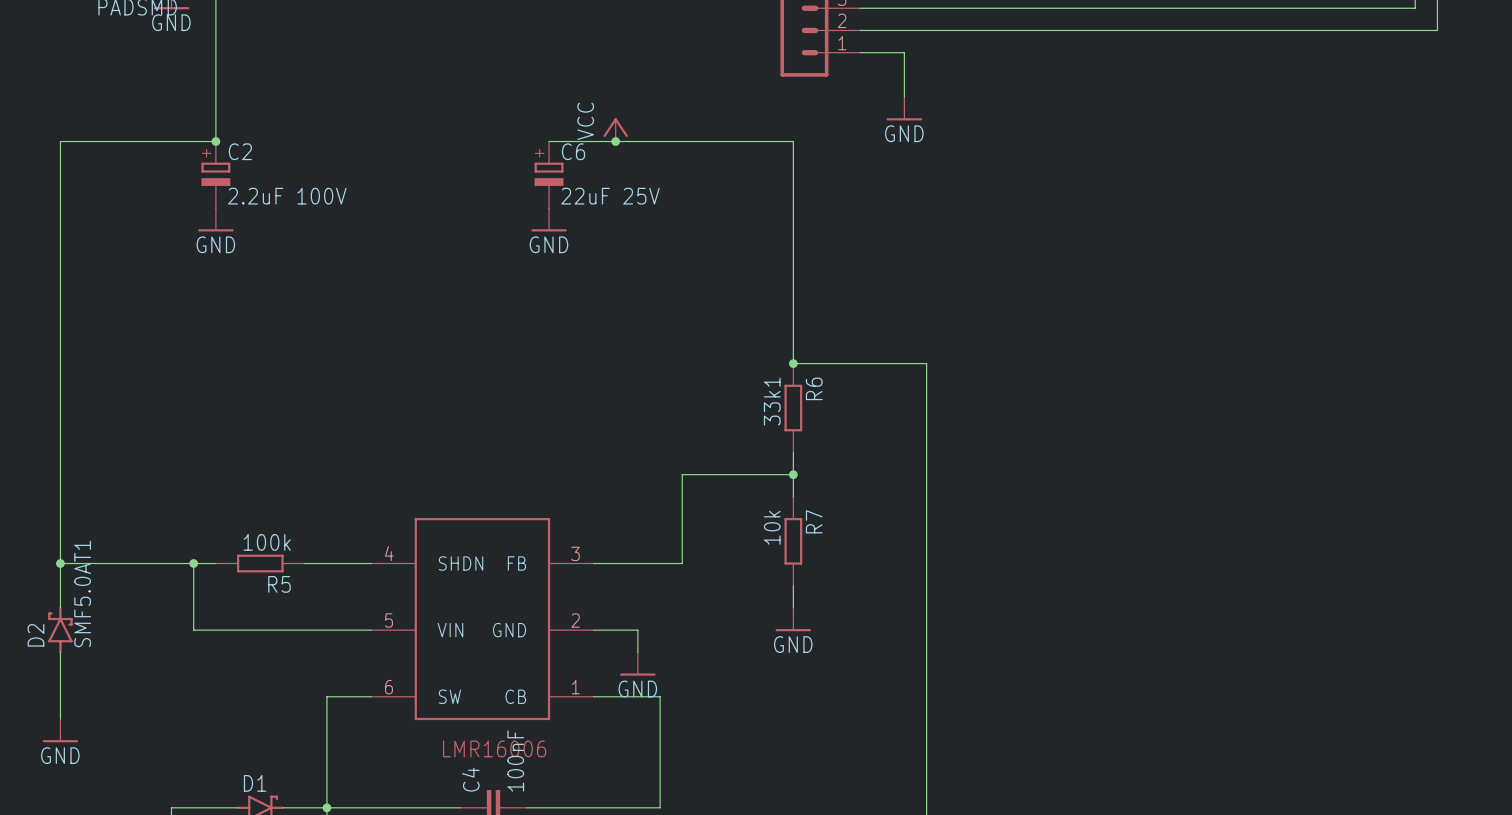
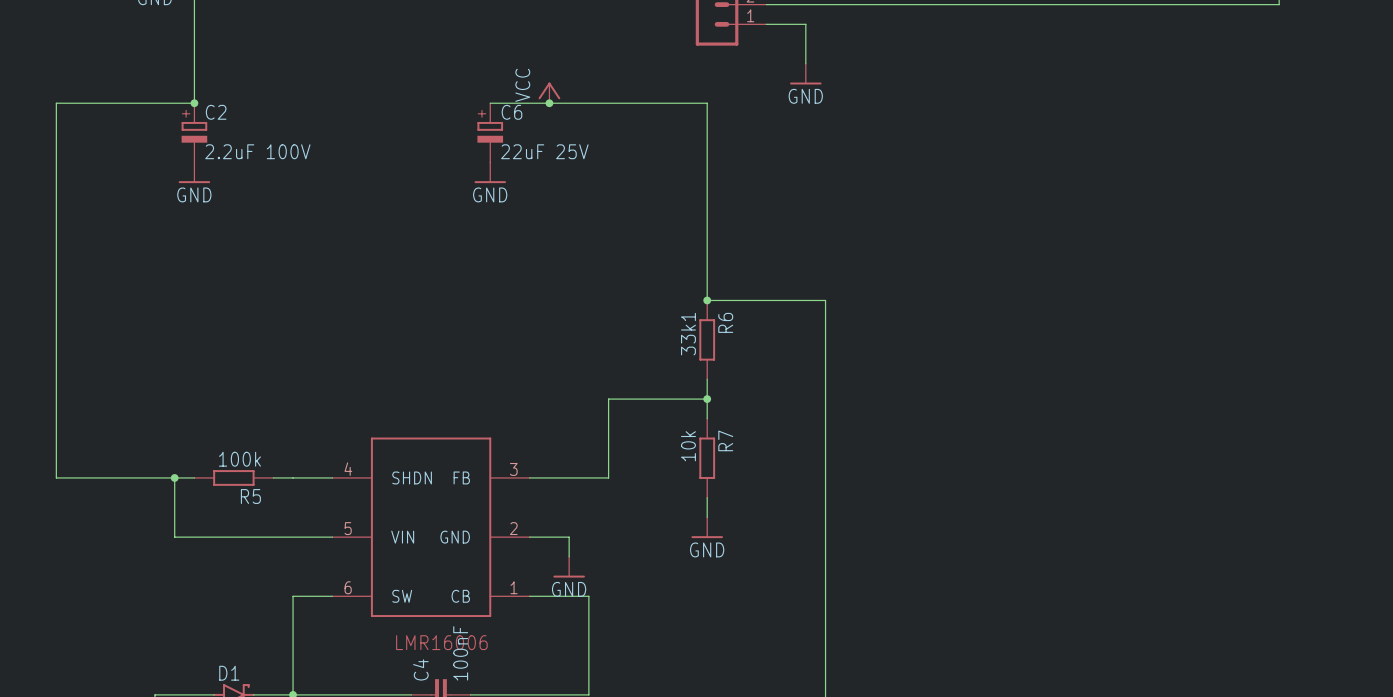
wire: (60, 563) (60, 607) -> none
junction: (60, 563) -> none
D2: SMF5.0AT1 (60, 630) -> none
wire: (60, 652) (60, 718) -> none
power symbol: GND (60, 730) -> none

